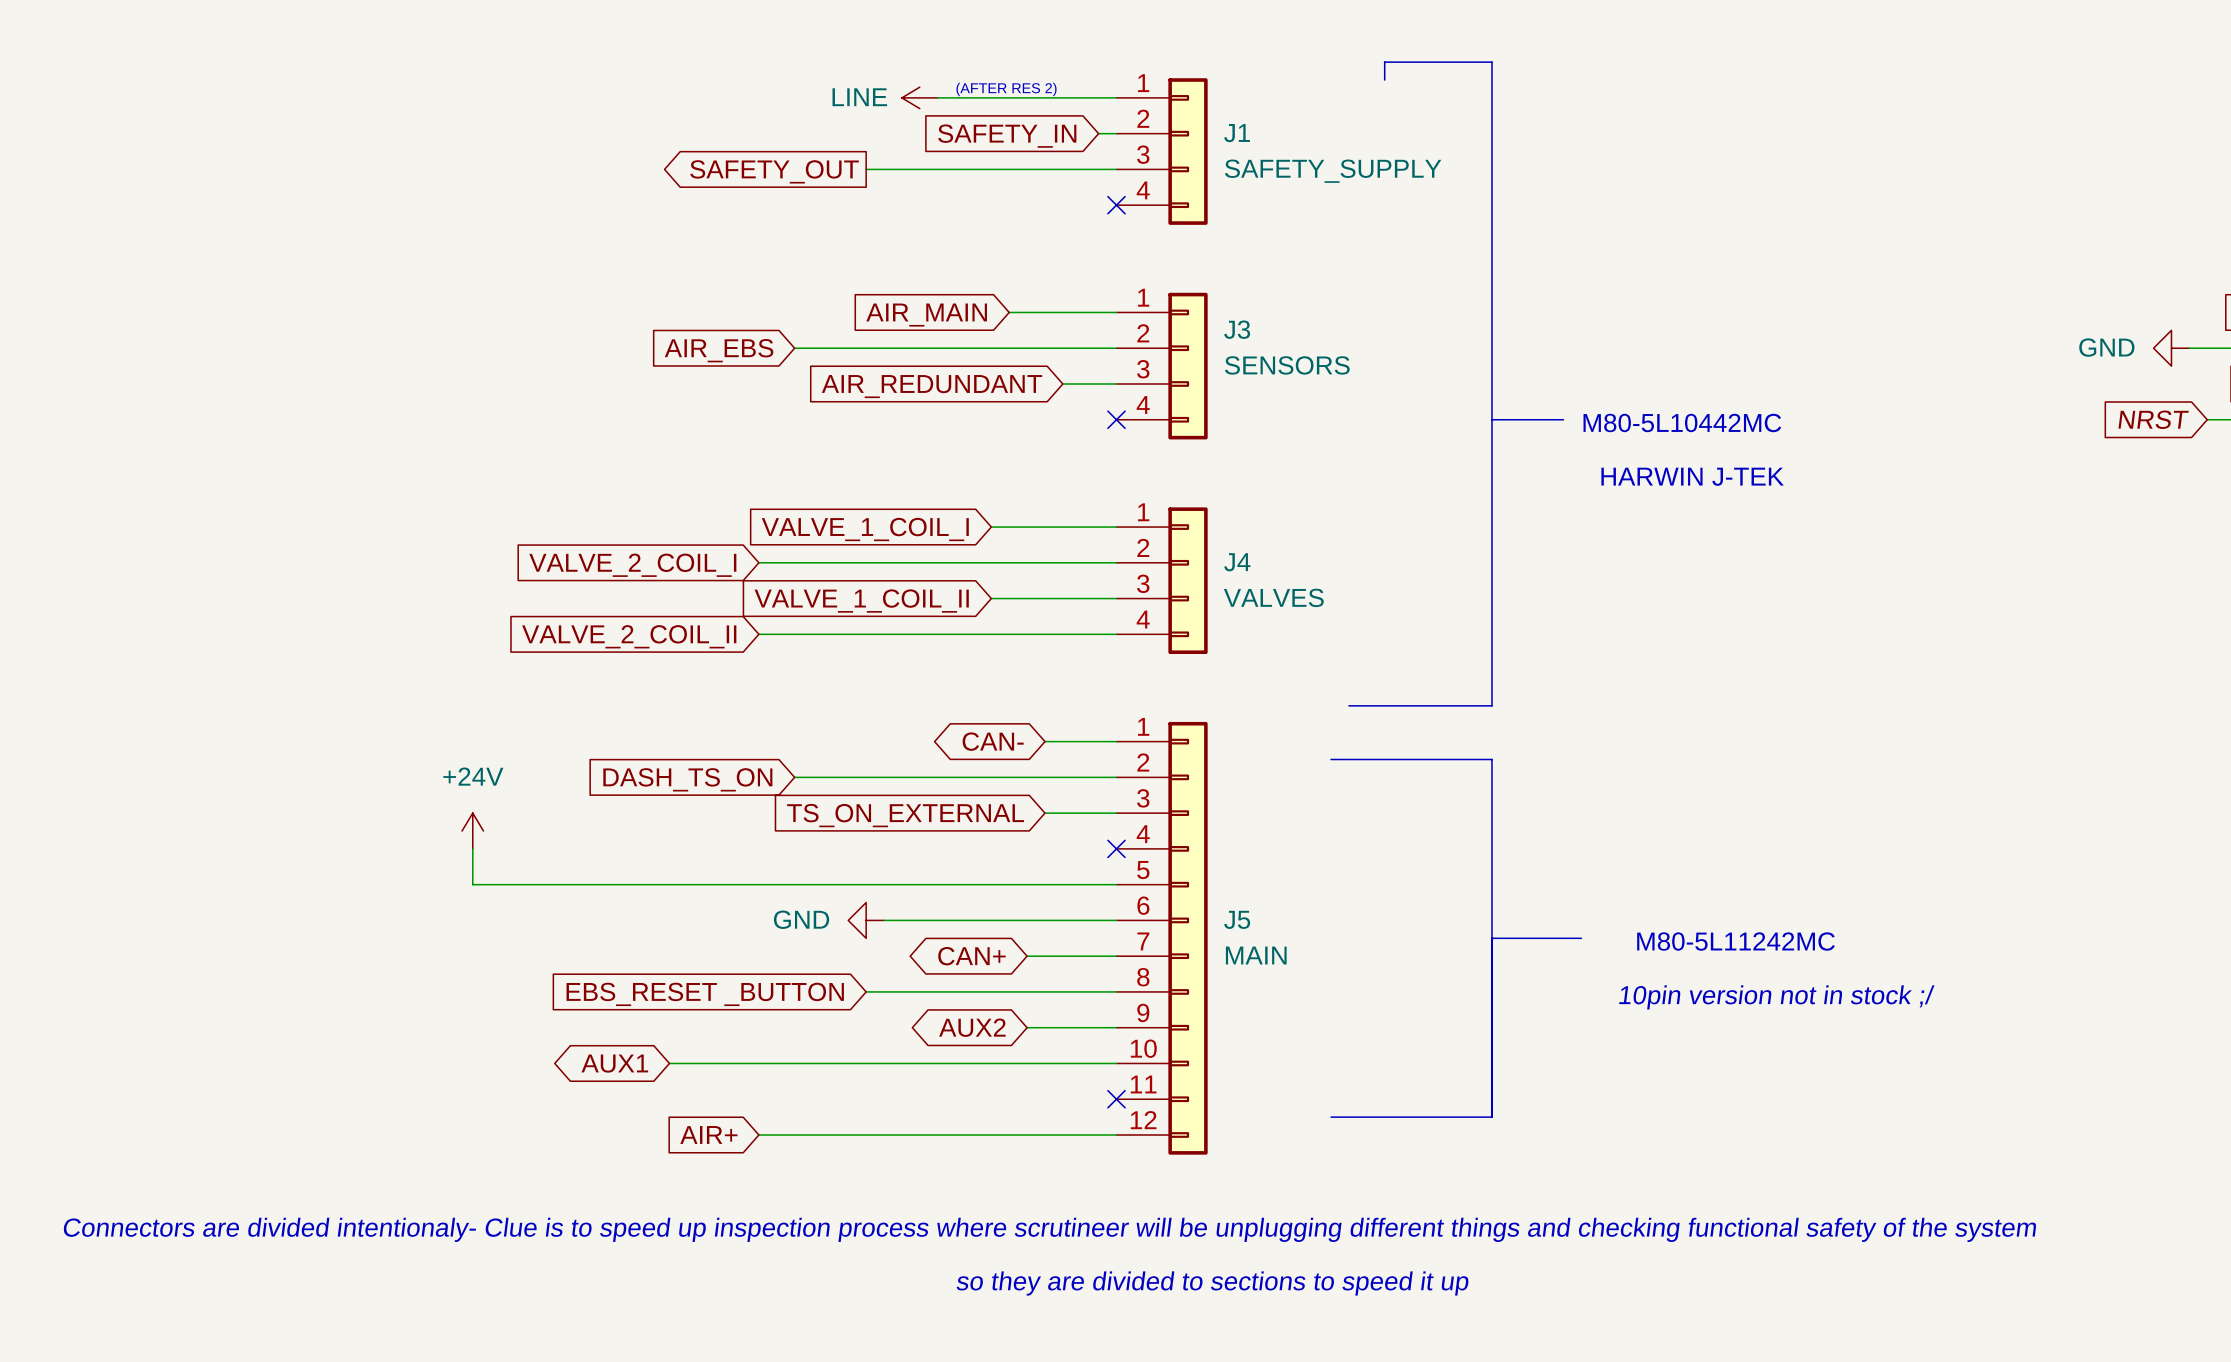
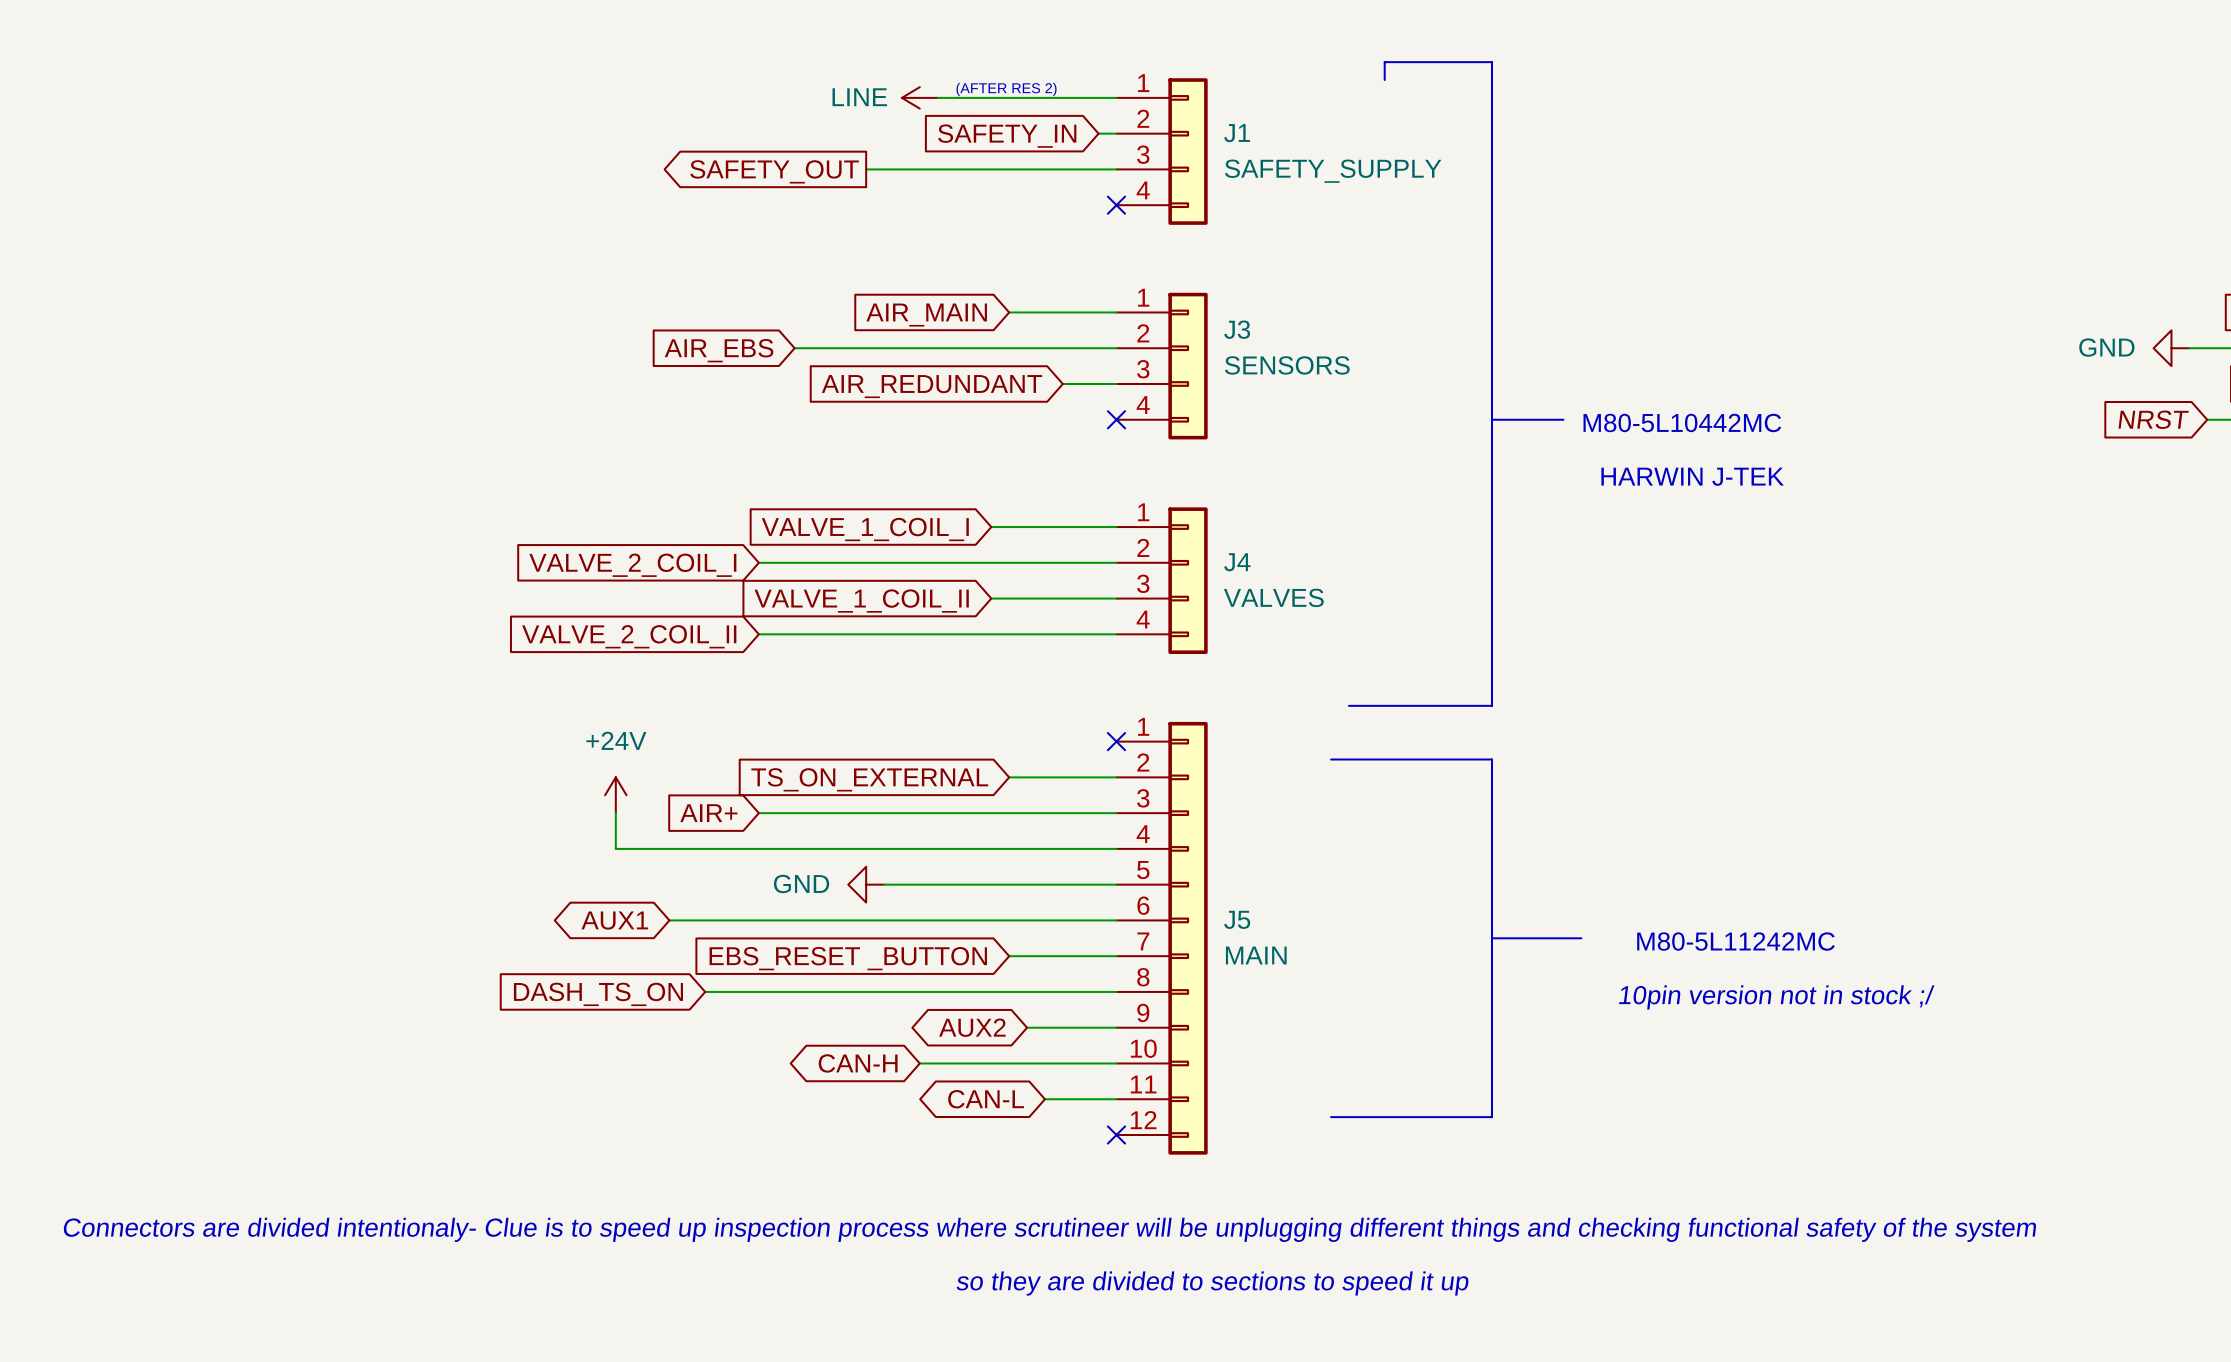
global label: CAN- (993, 741) -> none
wire: (1044, 741) (1116, 741) -> none
no-connect mark: none -> (1116, 741)
wire: (794, 777) (1009, 777) -> (669, 920) (884, 920)
global label position: DASH_TS_ON (687, 779) -> DASH_TS_ON (598, 994)
wire: none -> (615, 813) (615, 848) (1116, 848)
wire: none -> (758, 813) (1044, 813)
global label position: TS_ON_EXTERNAL (905, 815) -> TS_ON_EXTERNAL (869, 779)
power symbol position: +24V (472, 831) -> +24V (615, 795)
wire: (472, 848) (472, 884) (884, 884) -> none
no-connect mark: (1116, 848) -> none
power symbol position: GND (866, 920) -> GND (866, 884)
global label: CAN+ (971, 956) -> none
wire: none -> (1009, 956) (1027, 956)
wire: none -> (705, 991) (866, 991)
global label position: EBS_RESET _BUTTON (705, 994) -> EBS_RESET _BUTTON (848, 958)
global label position: AUX1 (614, 1063) -> AUX1 (614, 920)
wire: (669, 1063) (919, 1063) -> none
global label: none -> CAN-H (858, 1063)
global label: none -> CAN-L (986, 1099)
wire: none -> (1044, 1099) (1116, 1099)
no-connect mark position: (1116, 1099) -> (1116, 1134)
global label position: AIR+ (708, 1134) -> AIR+ (708, 813)
wire: (758, 1134) (1116, 1134) -> none

